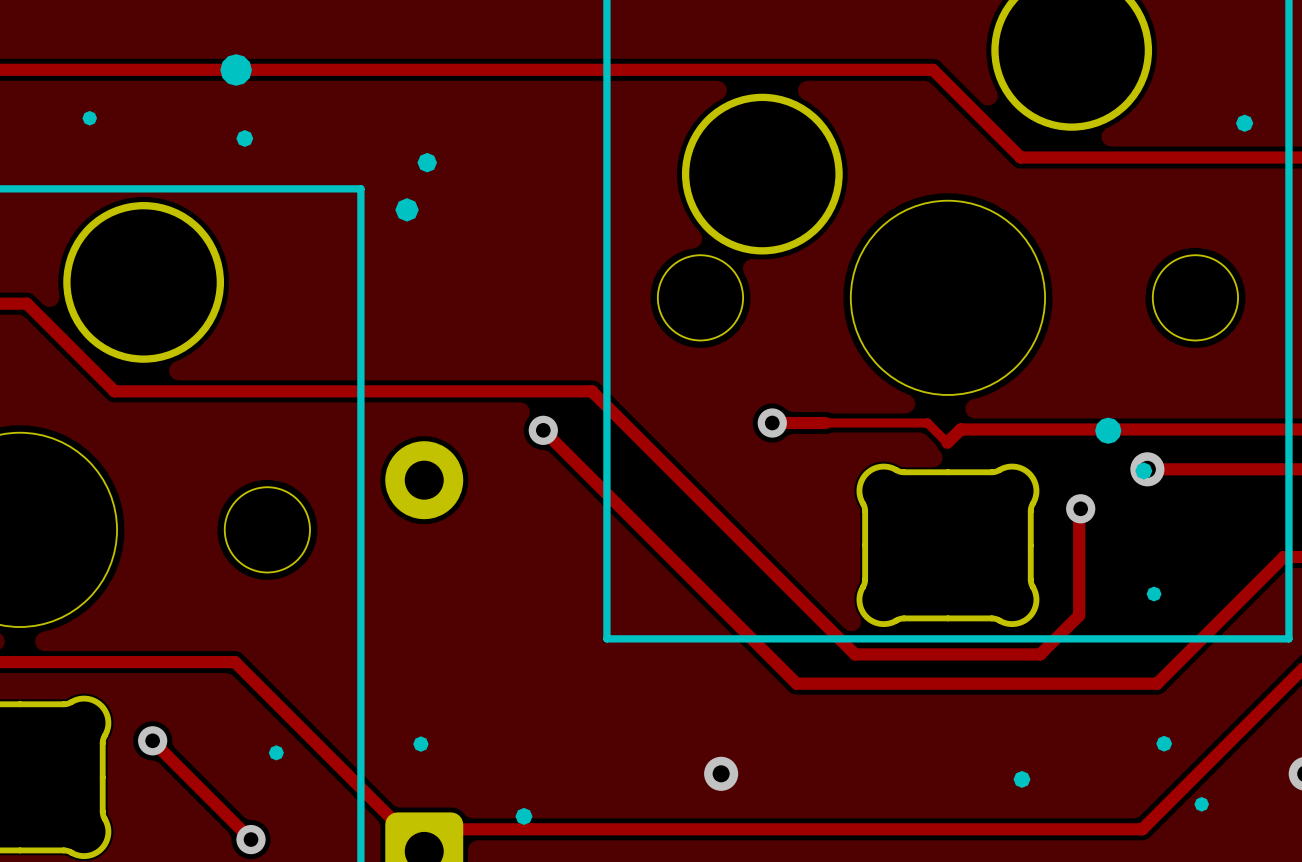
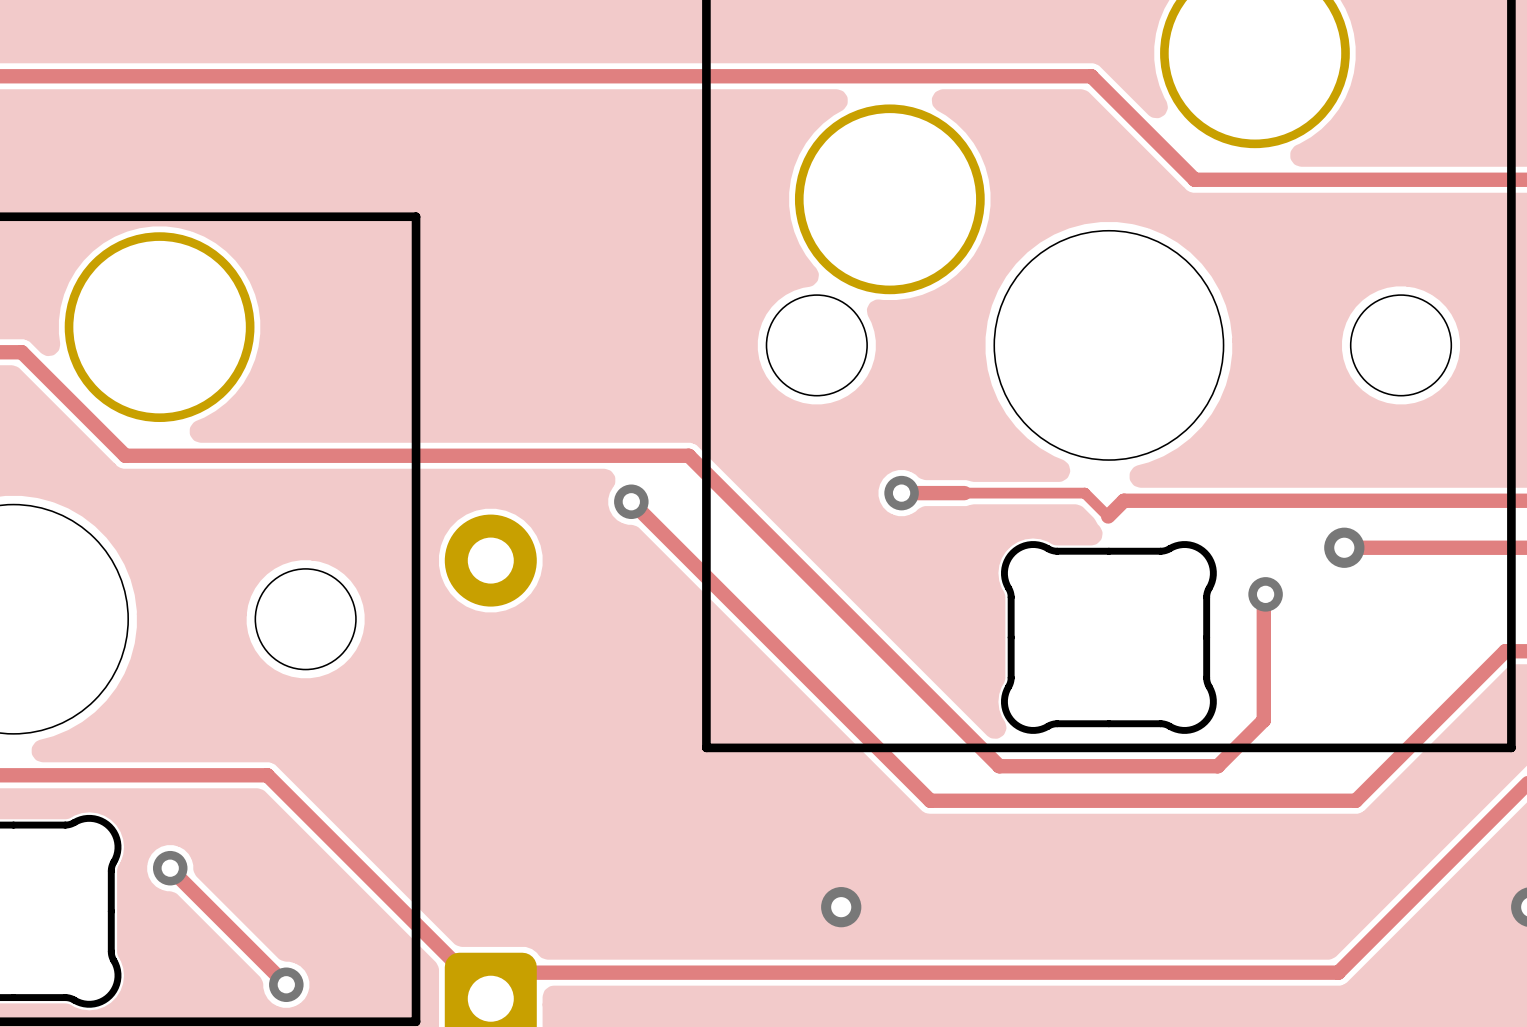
drawing: [220, 54, 254, 147] -> none
drawing: [82, 110, 98, 126] -> none
drawing: [1235, 114, 1254, 132] -> none
drawing: [395, 152, 438, 222] -> none
drawing: [1095, 417, 1153, 480] -> none
drawing: [1146, 586, 1162, 602] -> none
drawing: [1156, 735, 1210, 812] -> none
drawing: [413, 736, 429, 752] -> none
drawing: [268, 745, 284, 761] -> none
drawing: [1013, 770, 1031, 788] -> none
drawing: [515, 807, 533, 825] -> none

